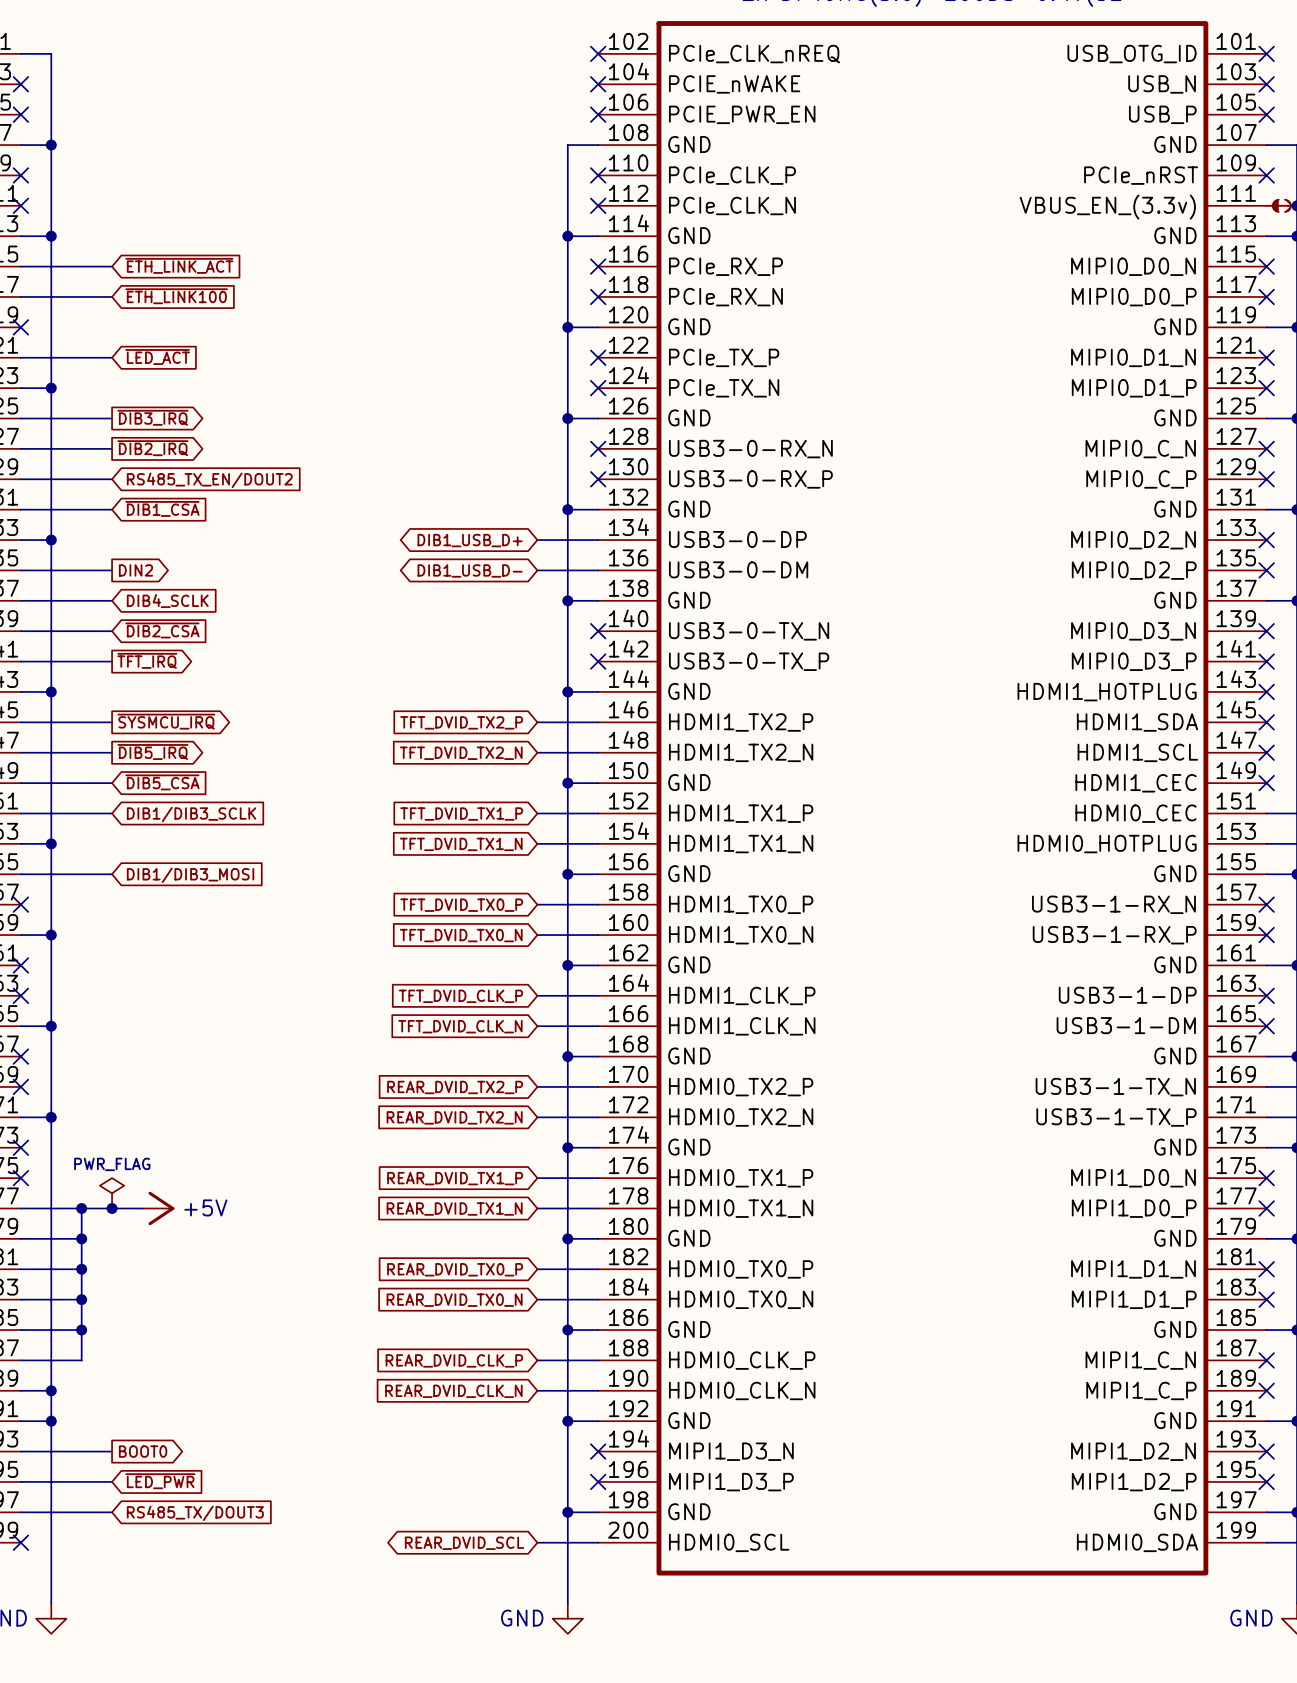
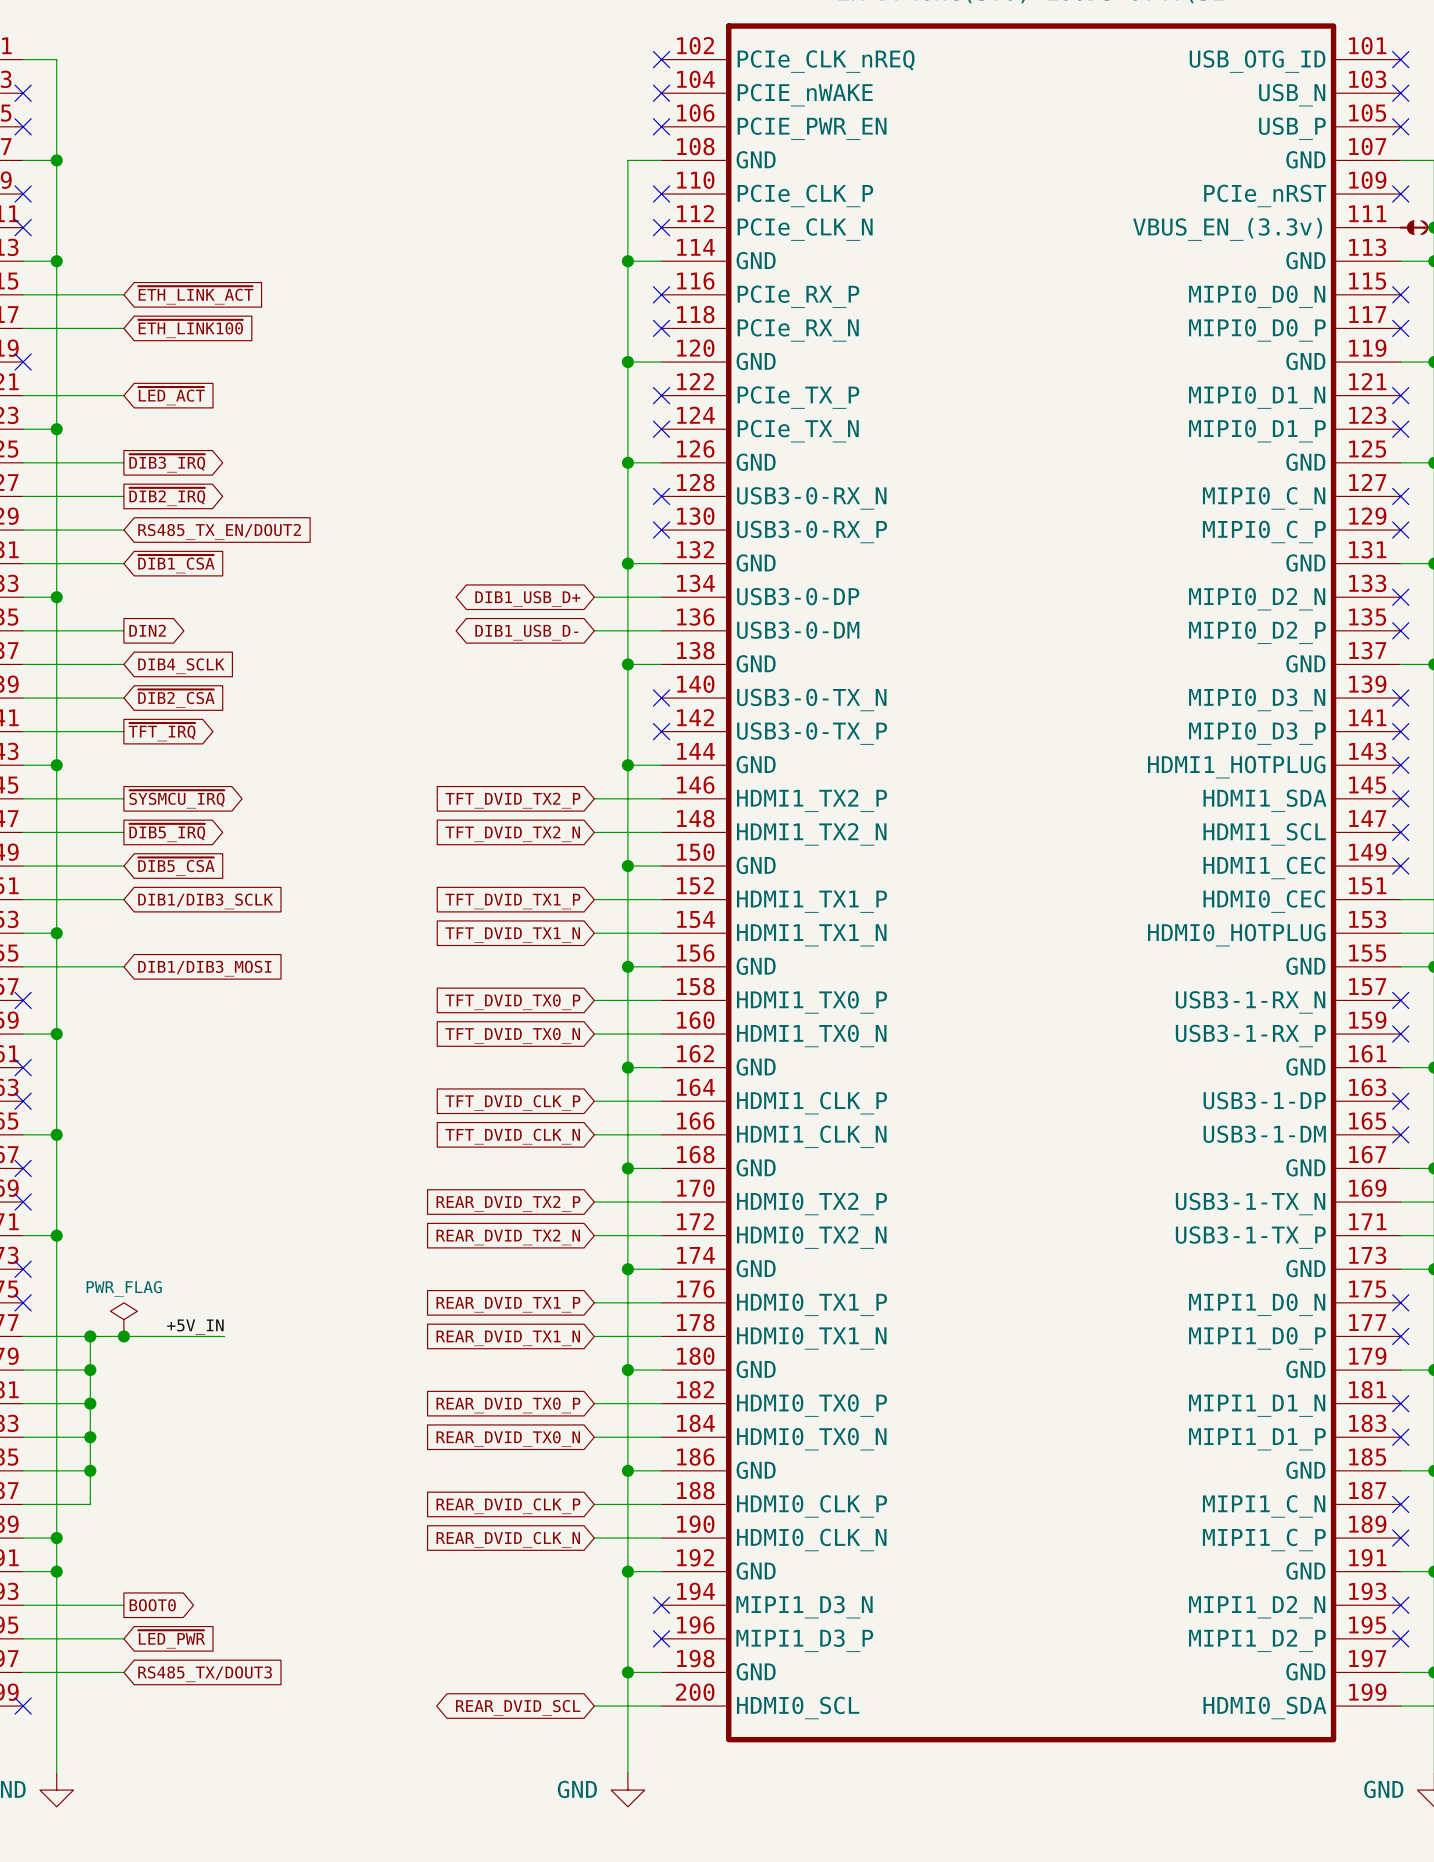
label: none -> +5V_IN (195, 1327)
power symbol: +5V (158, 1208) -> none

